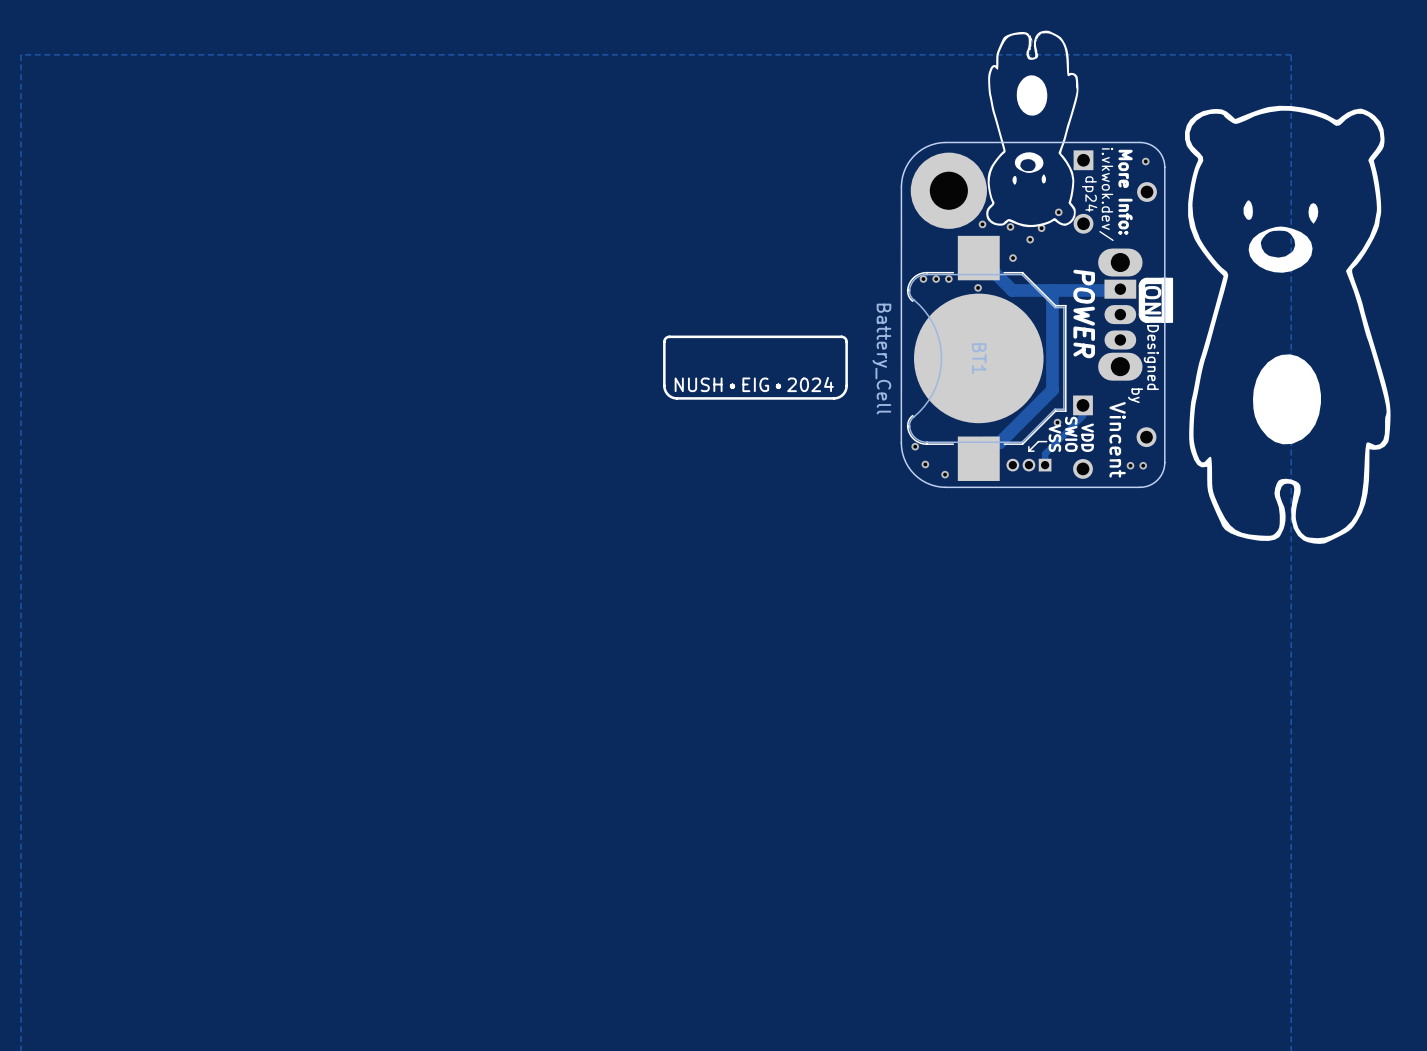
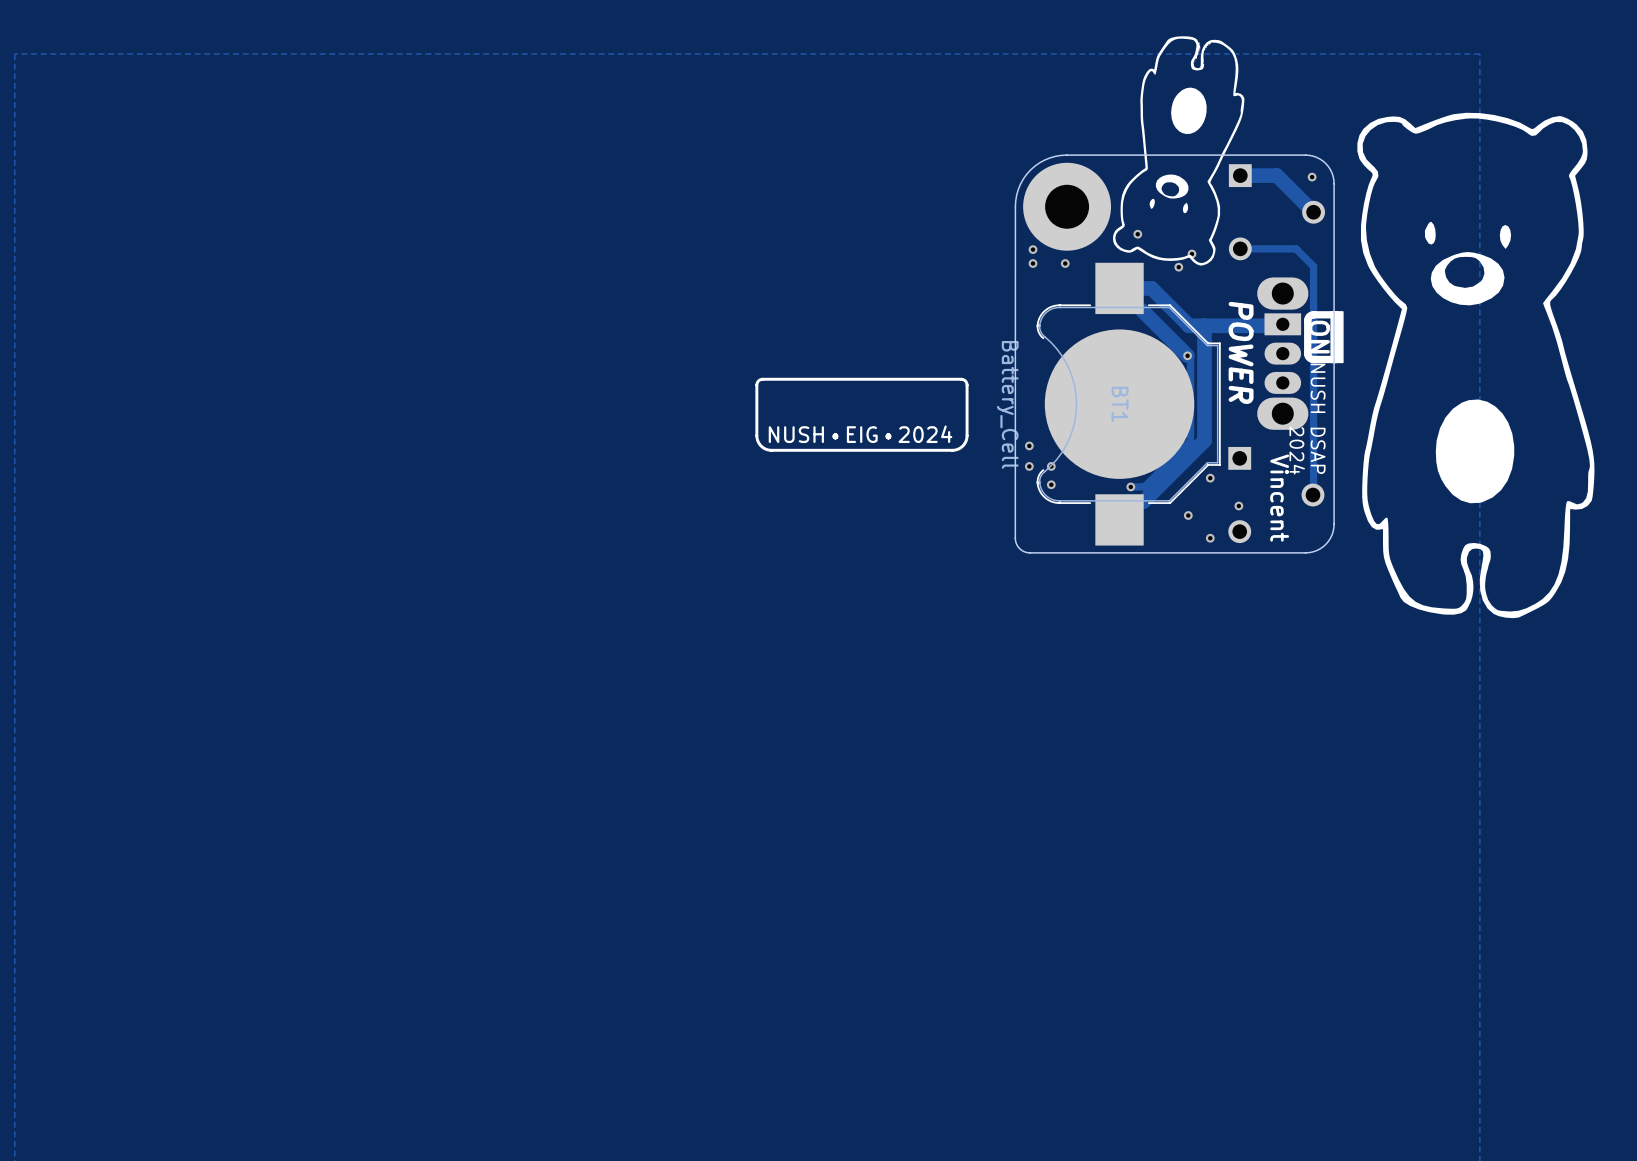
drawing shape: [986, 30, 1079, 228] -> [1112, 36, 1245, 266]
board edge: (945, 142) (926, 146) (914, 155) (905, 167) (901, 181) (901, 442) (905, 462) (914, 474) (926, 482) (945, 487) -> (1081, 155) (1055, 156) (1039, 162) (1023, 179) (1016, 194) (1015, 538) (1018, 547) (1026, 552) (1081, 552)
track: none -> (1240, 175) (1276, 175) (1313, 212)
part position: (948, 190) -> (1067, 206)
text: More Info: (1125, 192) -> none
text: dp24 (1089, 194) -> none
text: i.vkwok.dev/ (1106, 194) -> none
via: none -> (1137, 234)
via: (1058, 212) -> none
track: none -> (1240, 248) (1295, 248) (1313, 266) (1312, 495)
via: none -> (1033, 249)
via: (982, 224) -> none
via: (1010, 226) -> none
via: none -> (1033, 263)
via: none -> (1065, 263)
track: (979, 258) (1012, 290) (1039, 290) -> (1107, 288) (1151, 288) (1189, 325)
via: (1013, 258) -> none
track: none -> (1142, 310) (1190, 358) (1190, 440) (1144, 486) (1130, 486)
via: (923, 279) -> none
via: (936, 279) -> none
via: (948, 279) -> none
via: (978, 287) -> none
via: none -> (1187, 355)
text: Designed (1151, 357) -> none
text: none -> NUSH DSAP (1318, 418)
via: none -> (1029, 445)
text: by (1135, 395) -> none
text: none -> 2024 (1297, 450)
track: (1083, 405) (1083, 416) (1045, 453) (1045, 465) -> none
via: none -> (1029, 466)
via: none -> (1051, 466)
via: none -> (1051, 484)
via: none -> (1130, 486)
text: SWIO (1071, 434) -> none
text: VDD (1087, 437) -> none
text: VSS (1054, 438) -> none
line: (1046, 441) (1038, 441) (1028, 451) -> none
via: (915, 446) -> none
line: (1028, 446) (1028, 451) -> none
via: none -> (1238, 505)
line: (1033, 451) (1028, 451) -> none
via: none -> (1188, 515)
via: (925, 464) -> none
part: (1028, 465) -> none
via: (1130, 465) -> none
via: (1143, 465) -> none
via: (945, 474) -> none
via: none -> (1210, 538)

